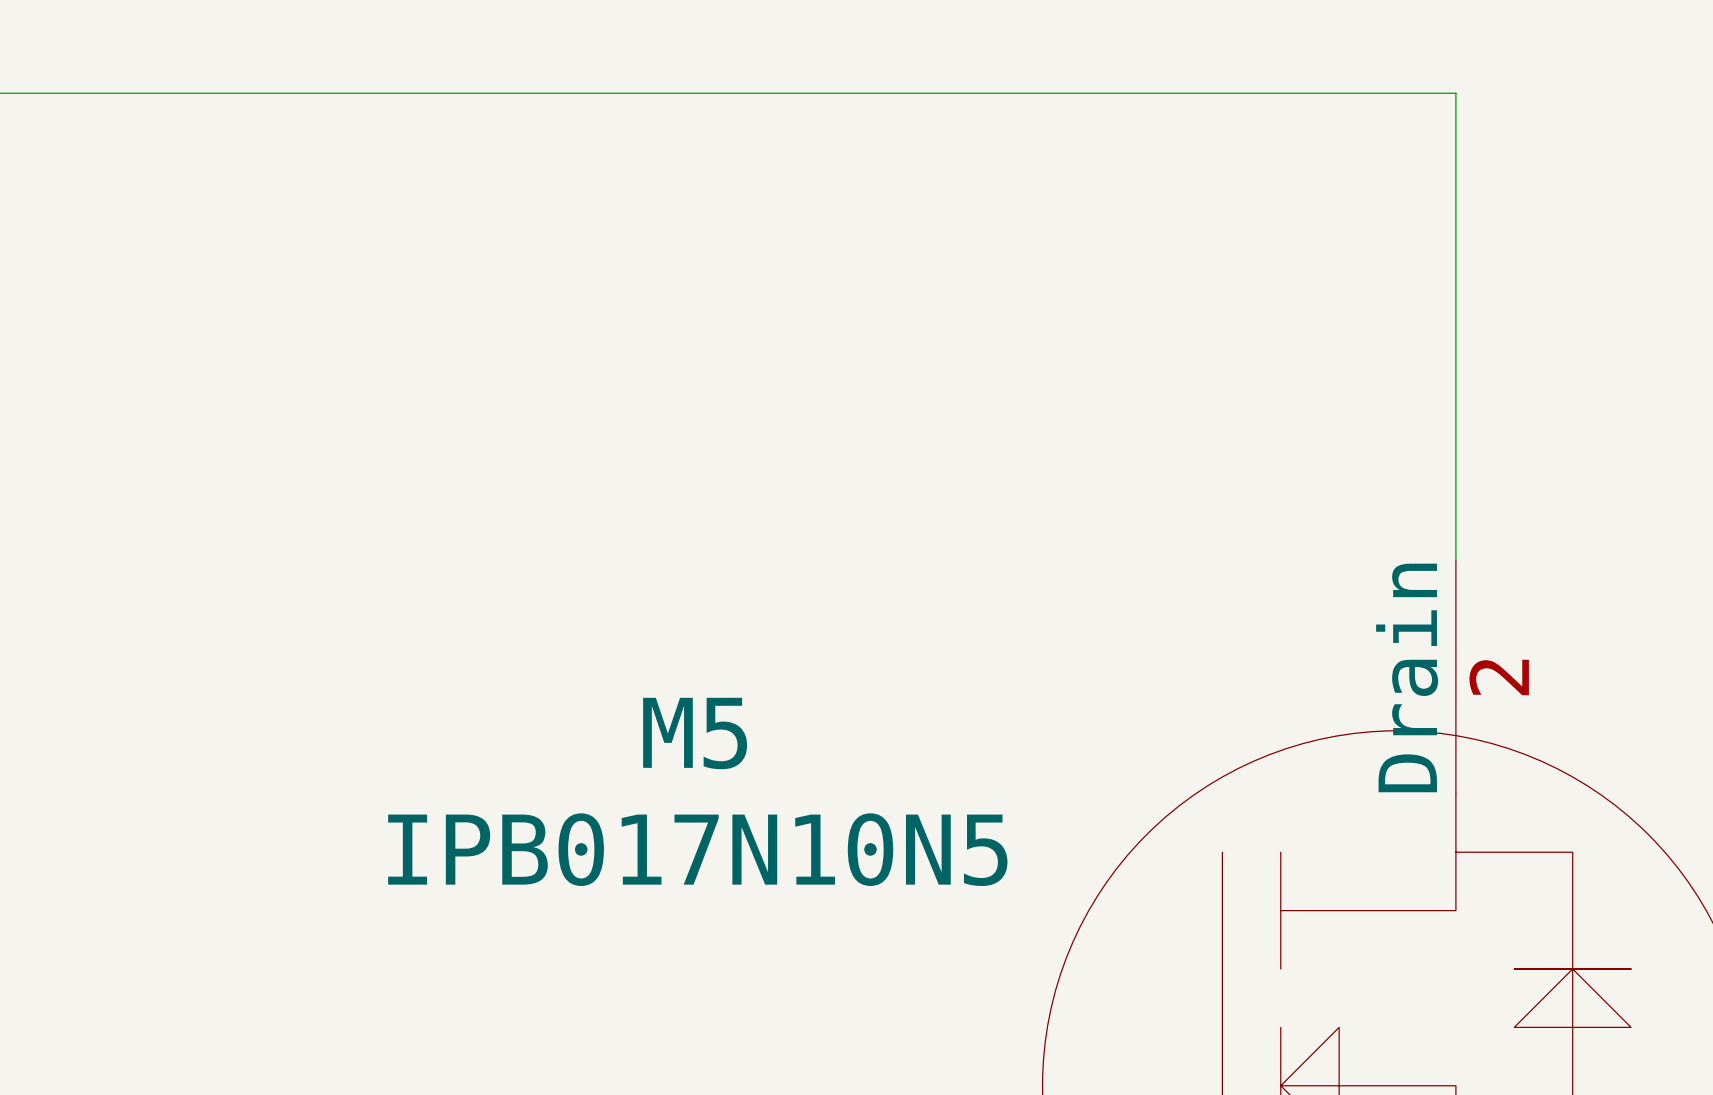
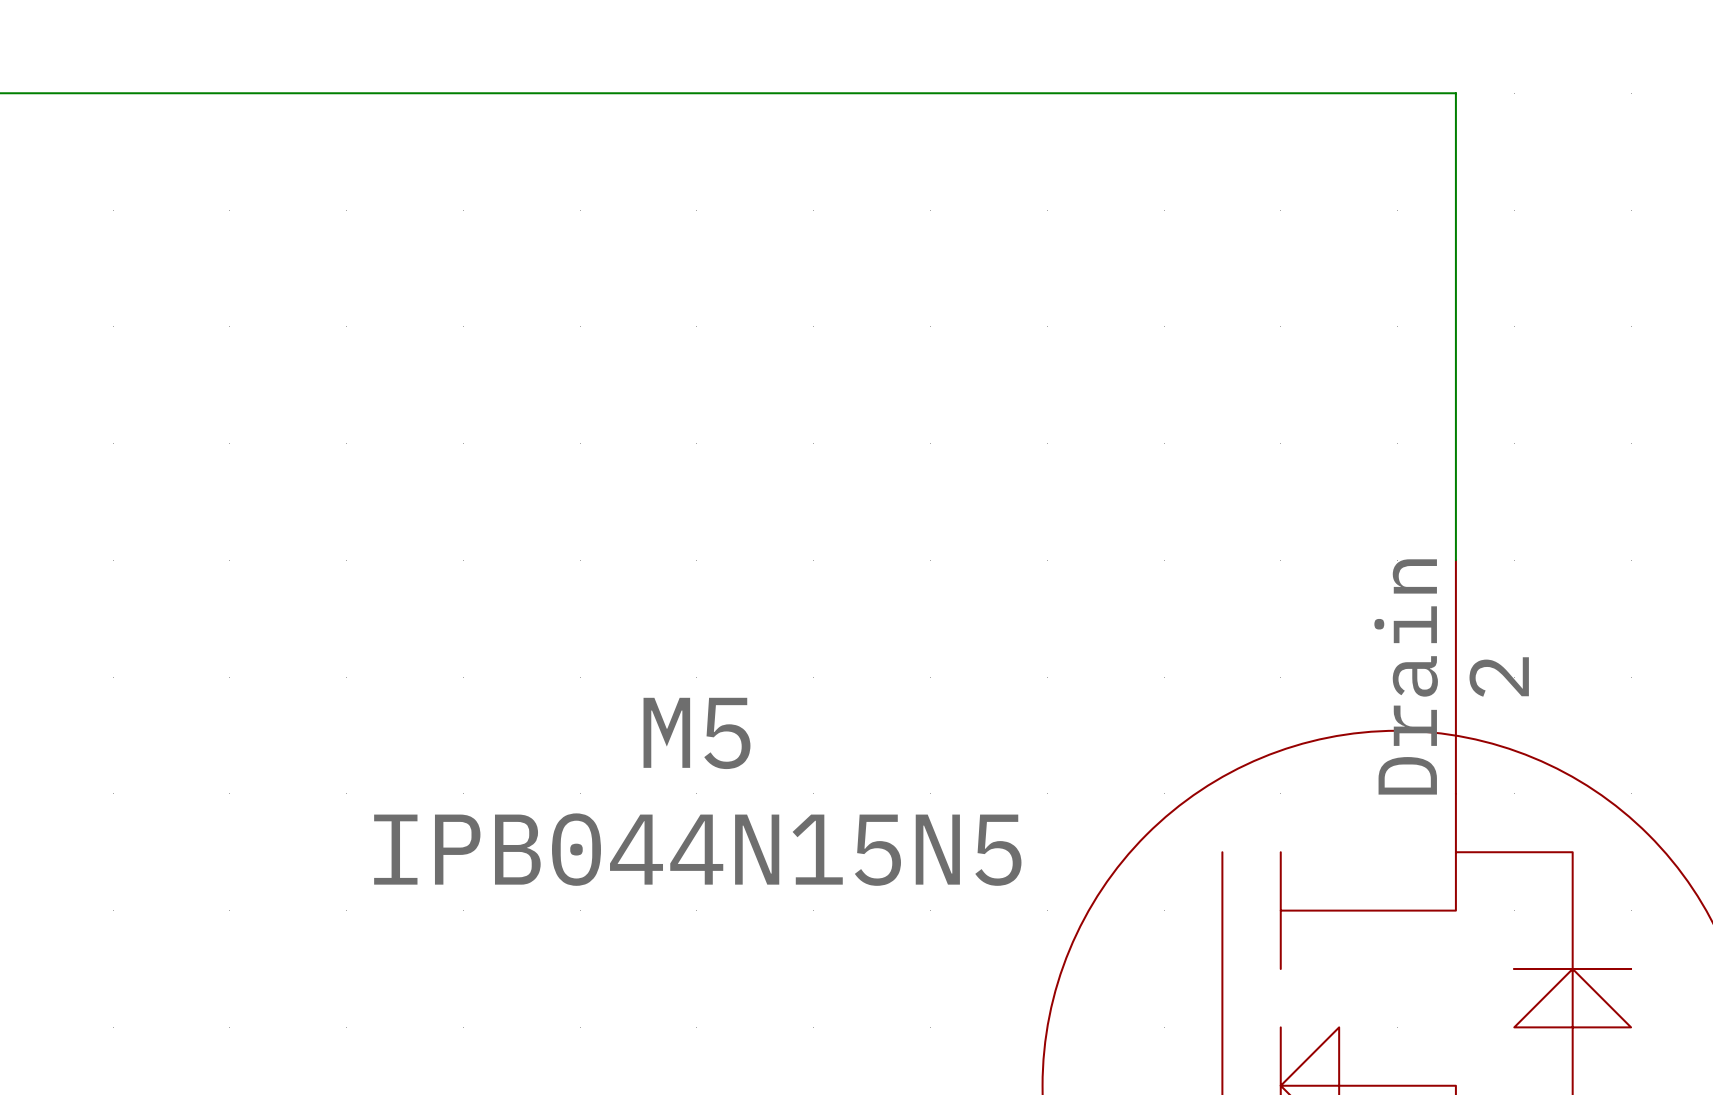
M5 value: IPB017N10N5 (697, 849) -> IPB044N15N5 (697, 849)

